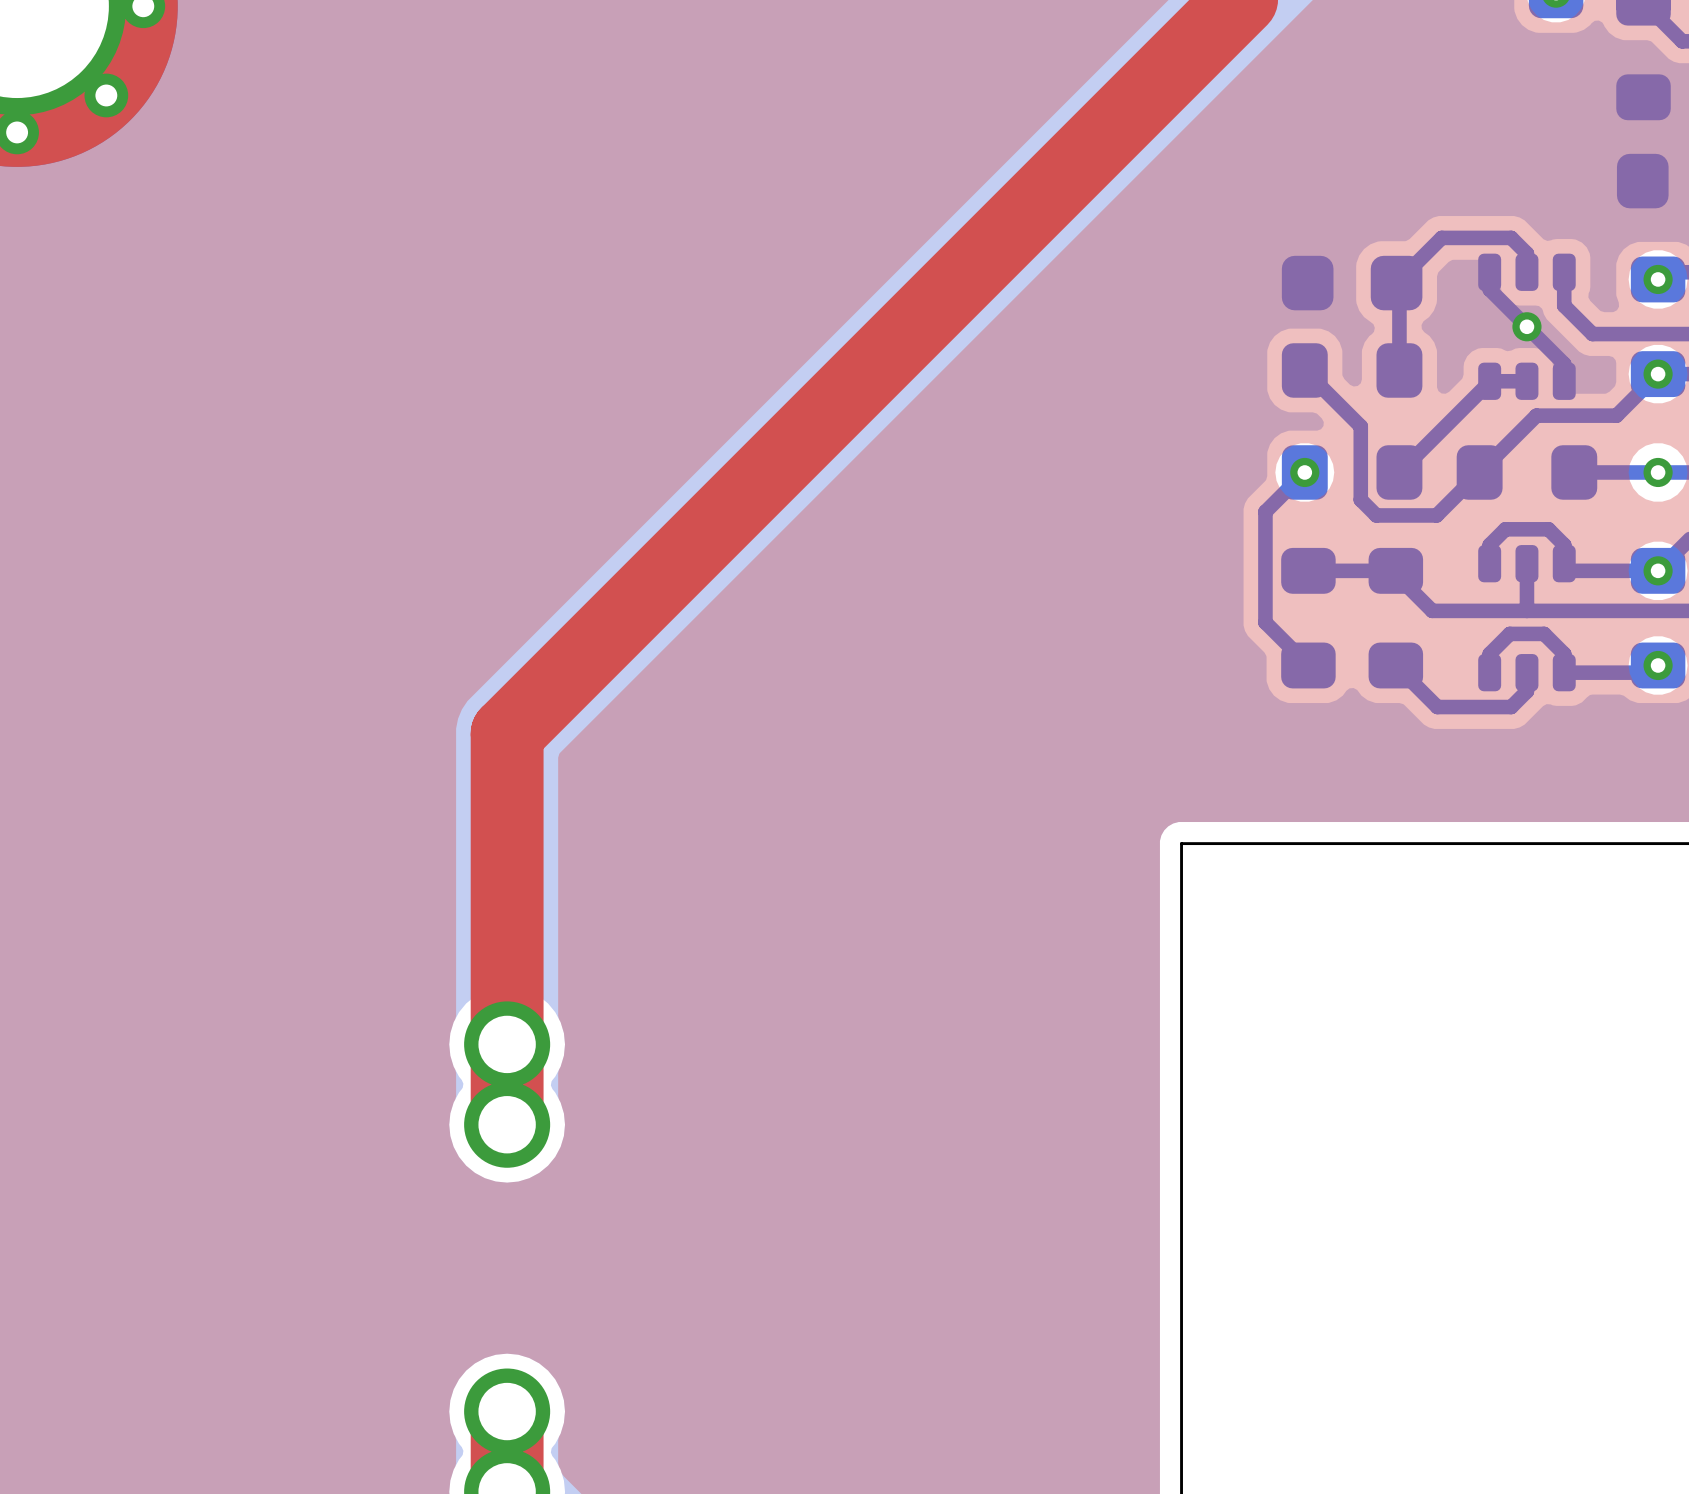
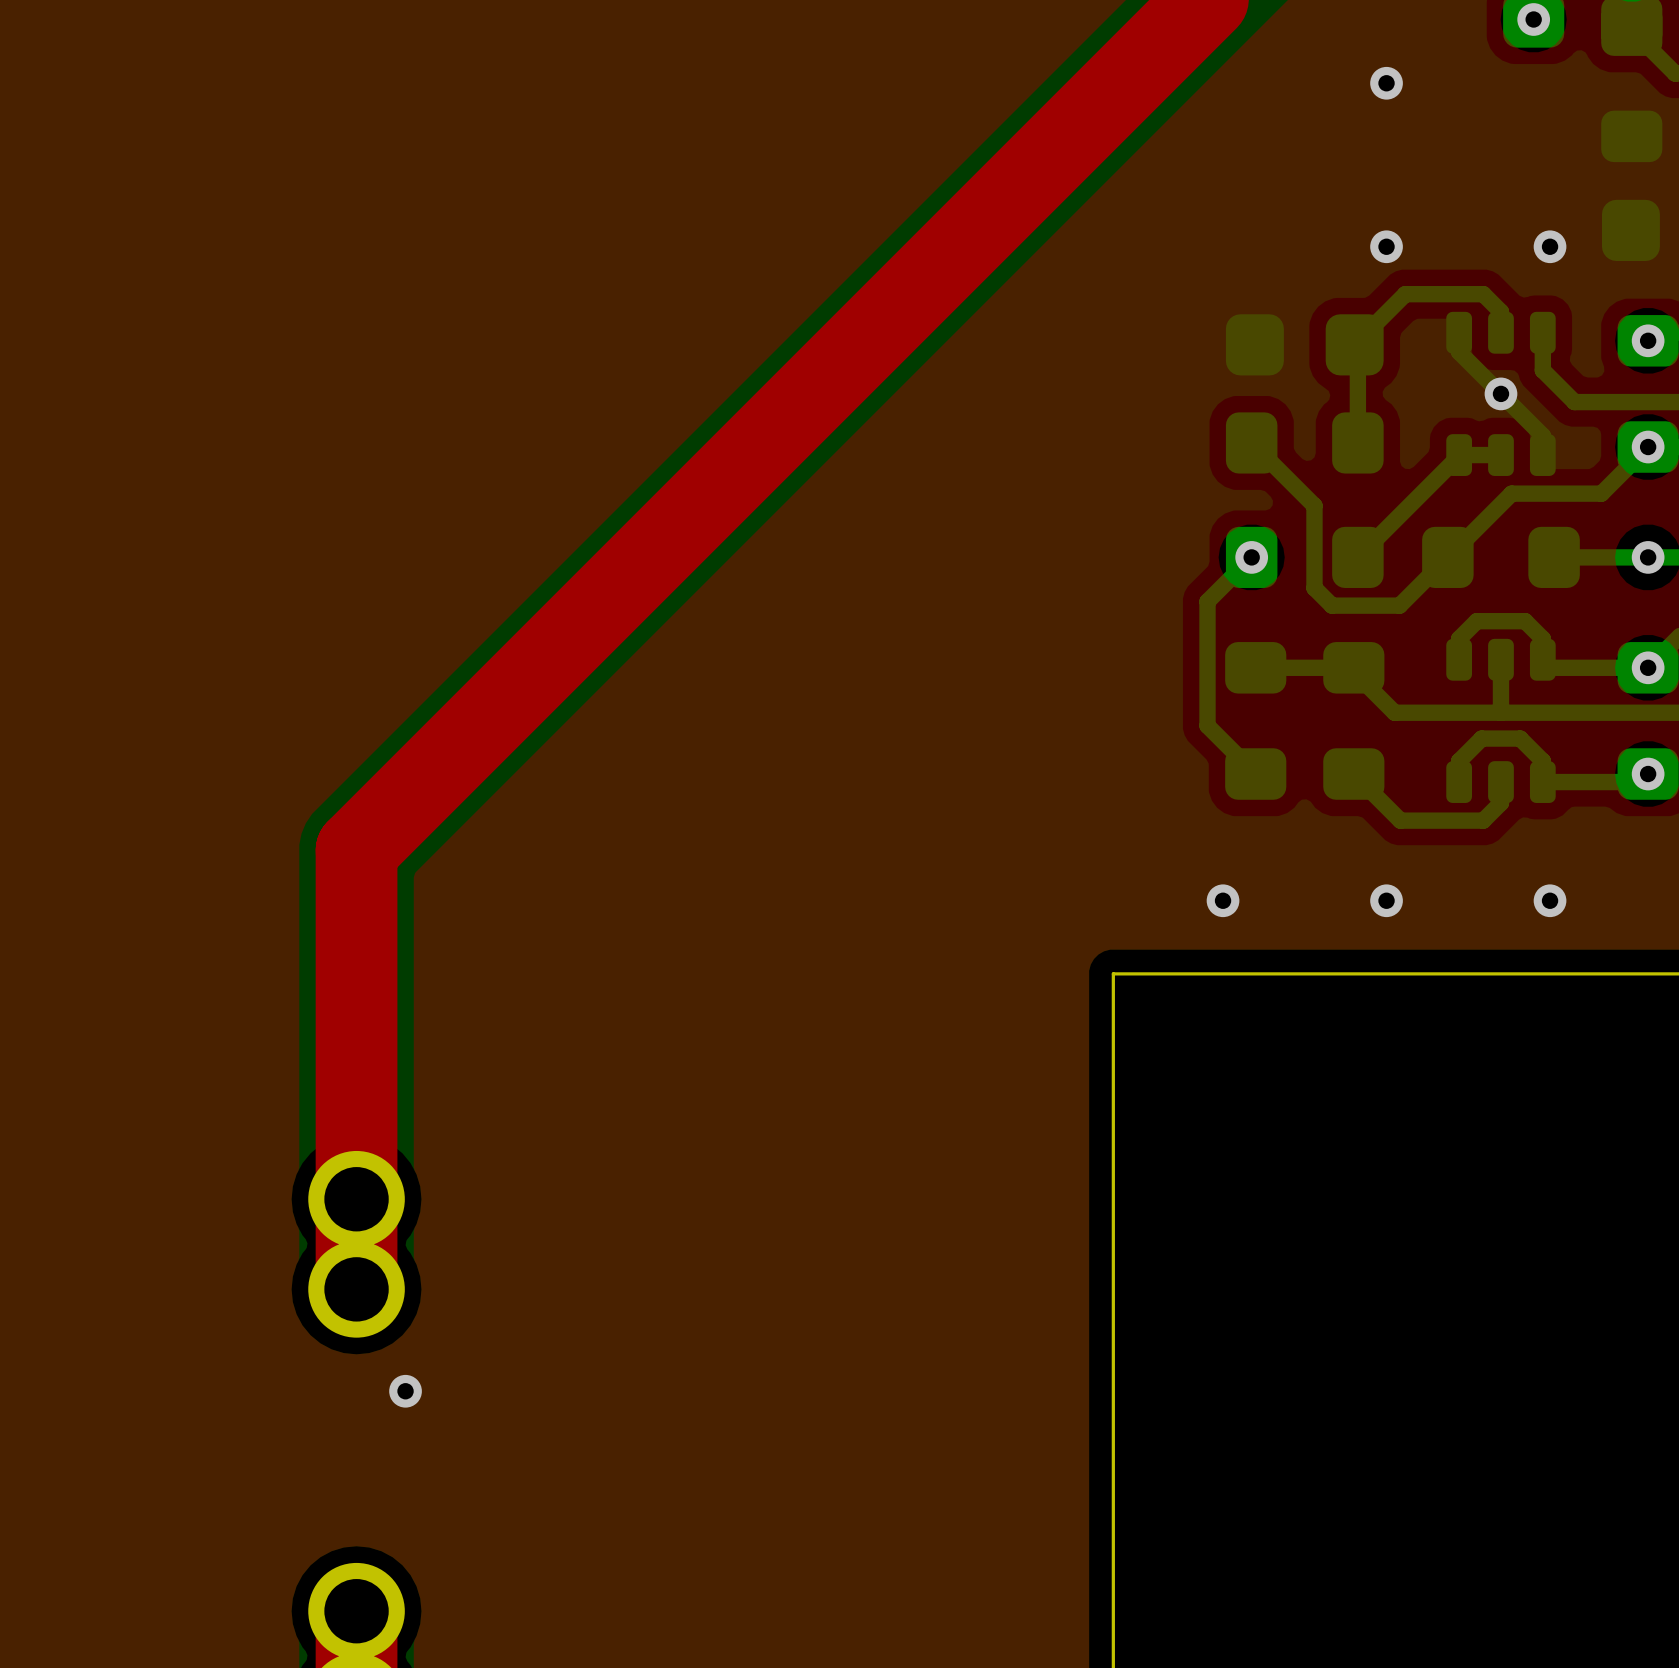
via: none -> (1386, 83)
via: none -> (1386, 246)
via: none -> (1550, 246)
via: none -> (1223, 900)
via: none -> (1386, 900)
via: none -> (1550, 900)
via: none -> (405, 1391)

